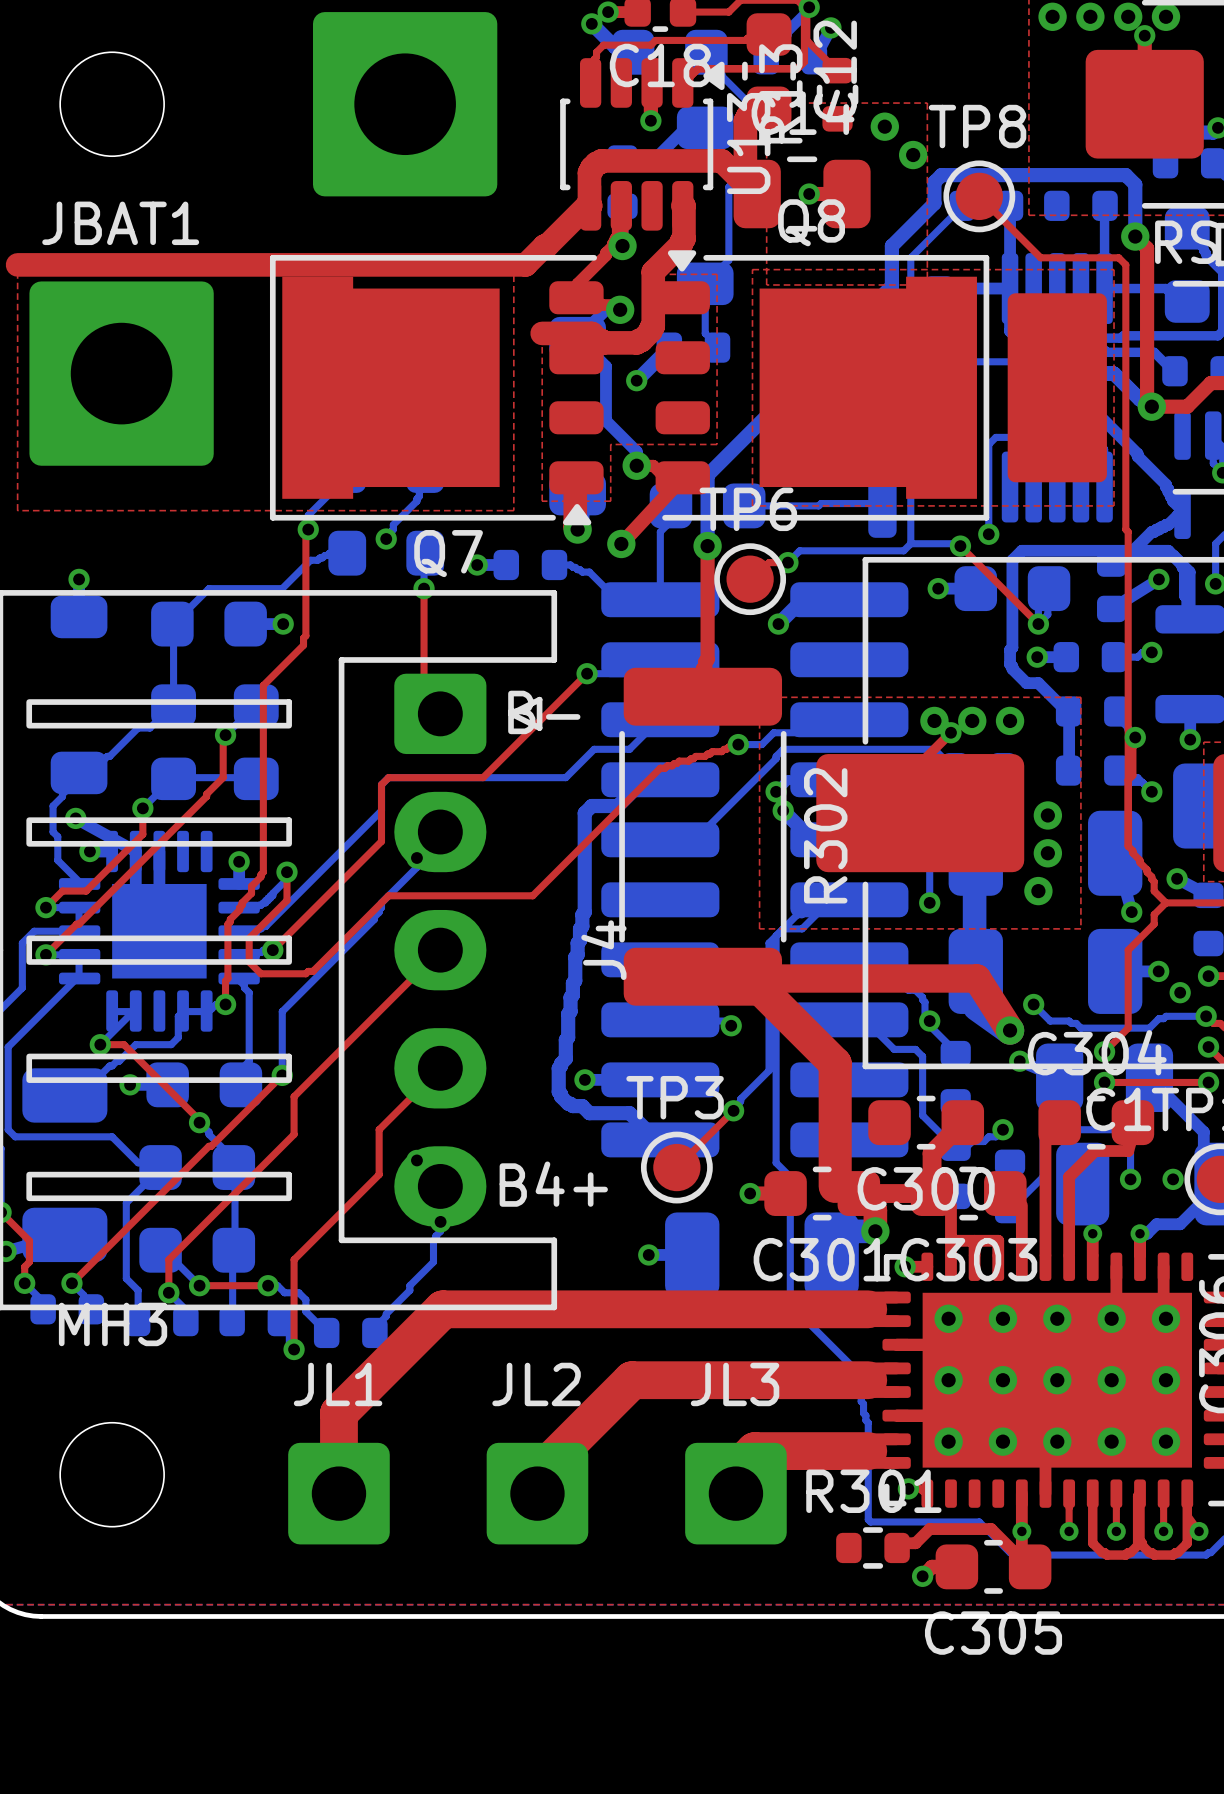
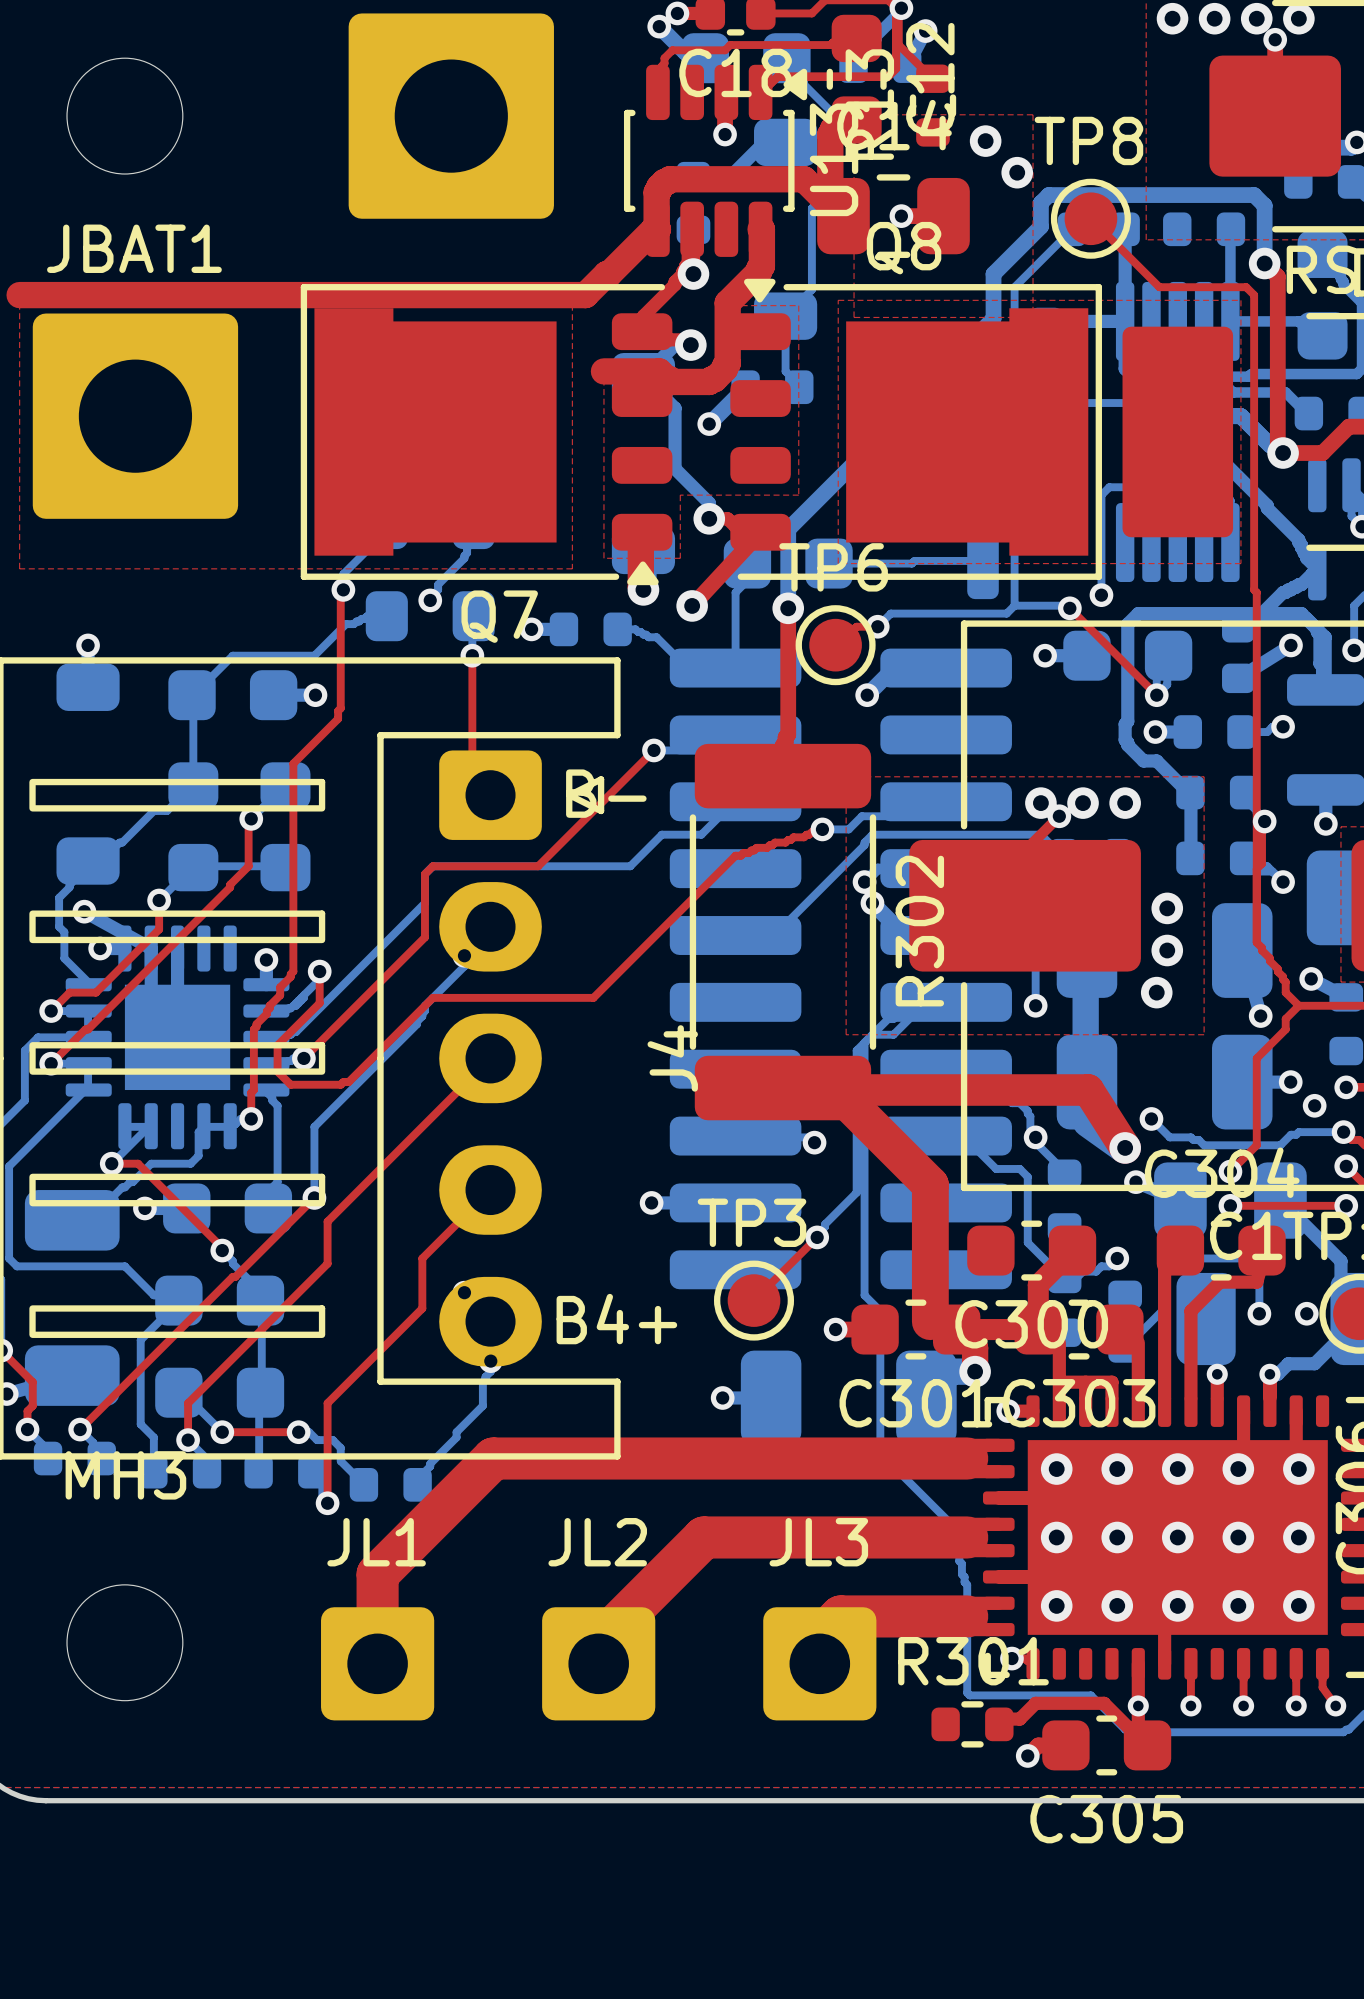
bottom track: (660, 779) (655, 784) (639, 784) (617, 806) (591, 806) (584, 813) (584, 912) (582, 914) (582, 926) (579, 928) (579, 940) (577, 943) (577, 954) (575, 957) (575, 980) (572, 983) (572, 995) (570, 997) (570, 1011) (568, 1013) (565, 1058) (558, 1068) (558, 1091) (568, 1103) (572, 1106) (582, 1106) (589, 1113) (629, 1113) (655, 1139) (660, 1139) -> none
top track: (1092, 1493) (1092, 1543) (1106, 1555) (1125, 1555) (1137, 1545) (1137, 1495) (1140, 1493) (1140, 1540) (1142, 1545) (1154, 1555) (1173, 1555) (1177, 1552) (1187, 1543) (1187, 1493) -> none

